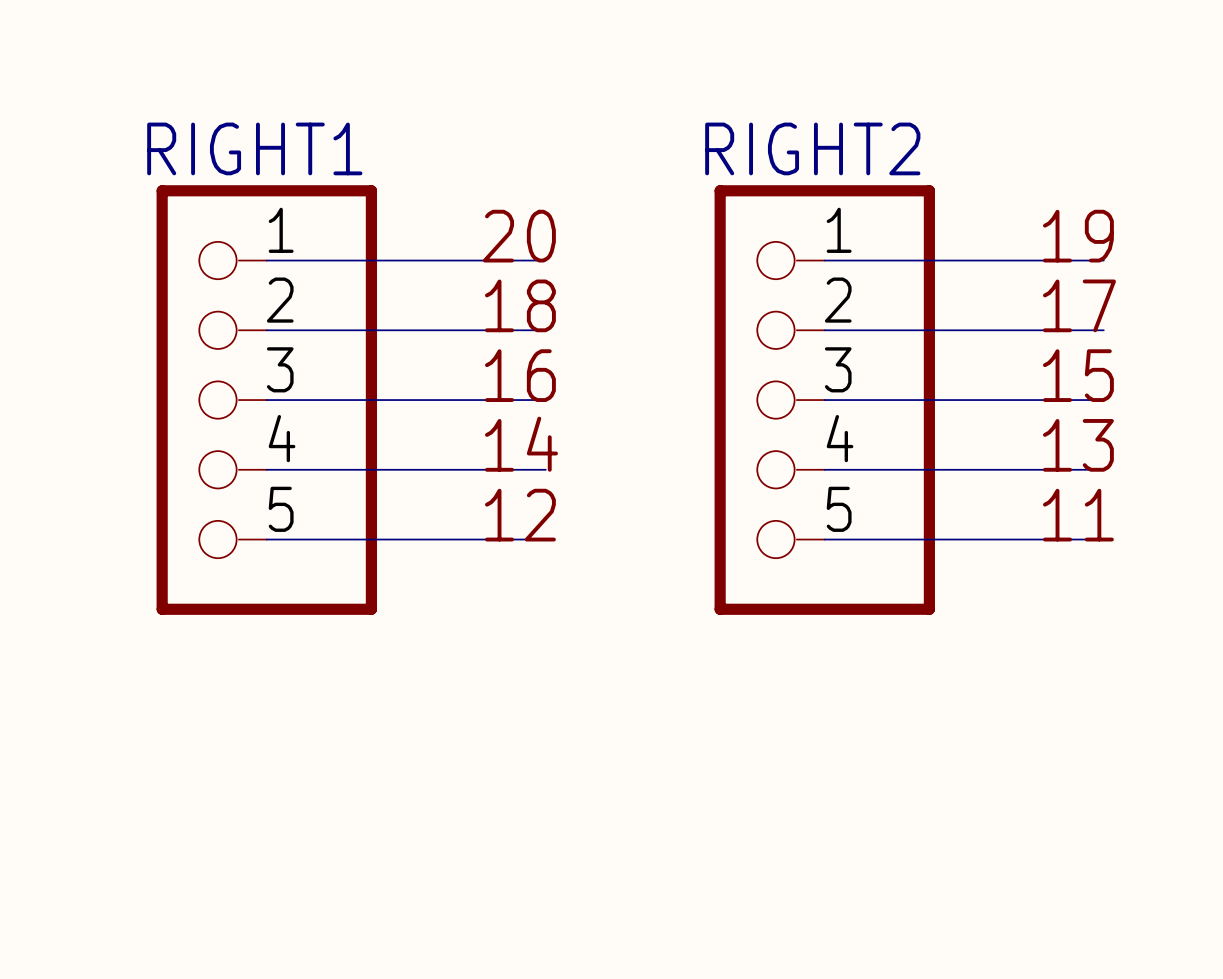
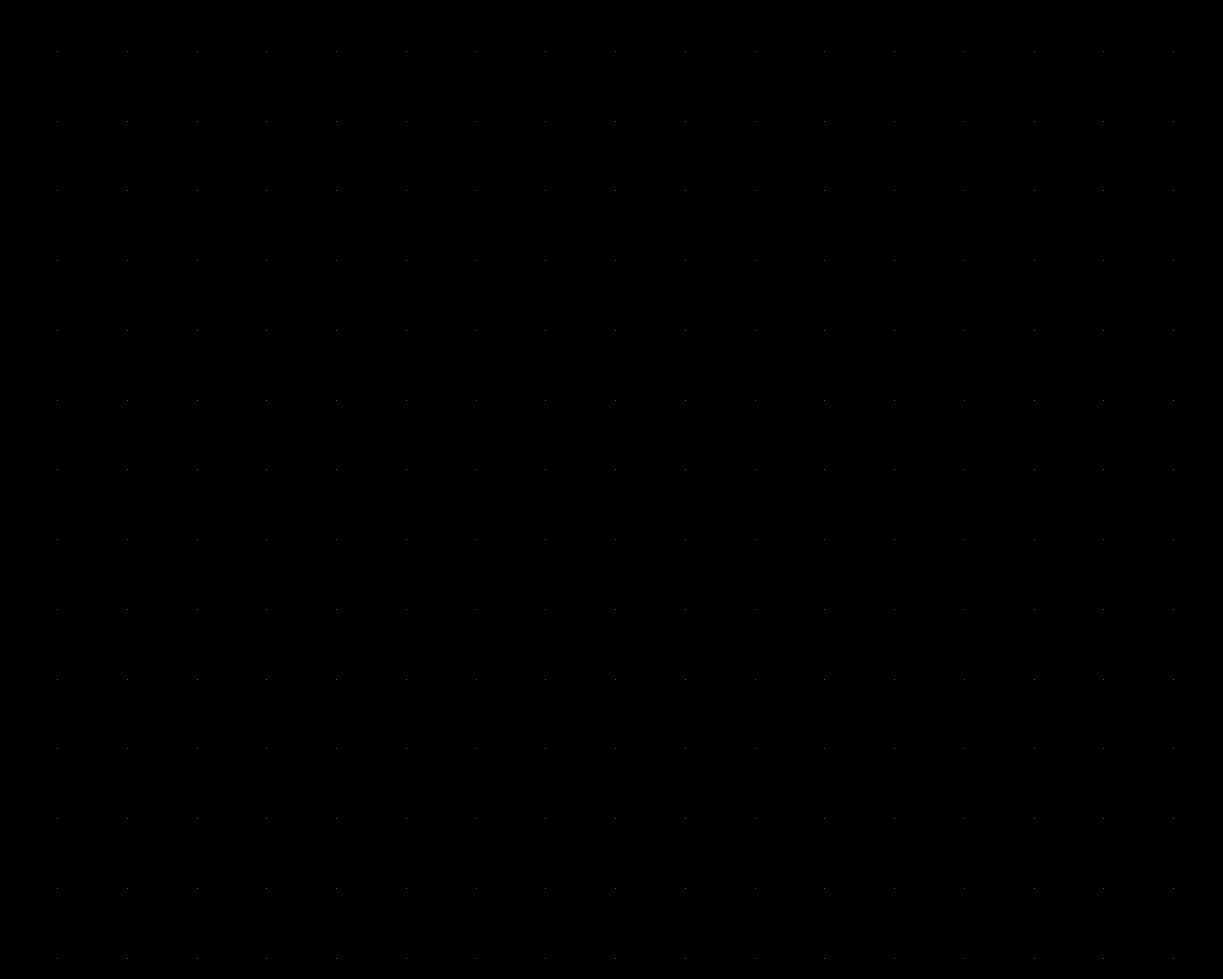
label: 20 (519, 236) -> none
label: 19 (1078, 236) -> none
wire: (266, 260) (545, 260) -> none
wire: (824, 260) (1103, 260) -> none
label: 18 (520, 305) -> none
label: 17 (1079, 305) -> none
wire: (266, 330) (545, 330) -> none
wire: (824, 330) (1103, 330) -> none
label: 16 (520, 375) -> none
label: 15 (1078, 375) -> none
wire: (266, 400) (545, 400) -> none
RIGHT1: (266, 400) -> none
wire: (824, 400) (1103, 400) -> none
RIGHT2: (824, 400) -> none
label: 14 (521, 444) -> none
label: 13 (1078, 445) -> none
wire: (266, 469) (545, 469) -> none
wire: (824, 469) (1103, 469) -> none
label: 12 (520, 515) -> none
label: 11 (1078, 515) -> none
wire: (266, 539) (545, 539) -> none
wire: (824, 539) (1103, 539) -> none

